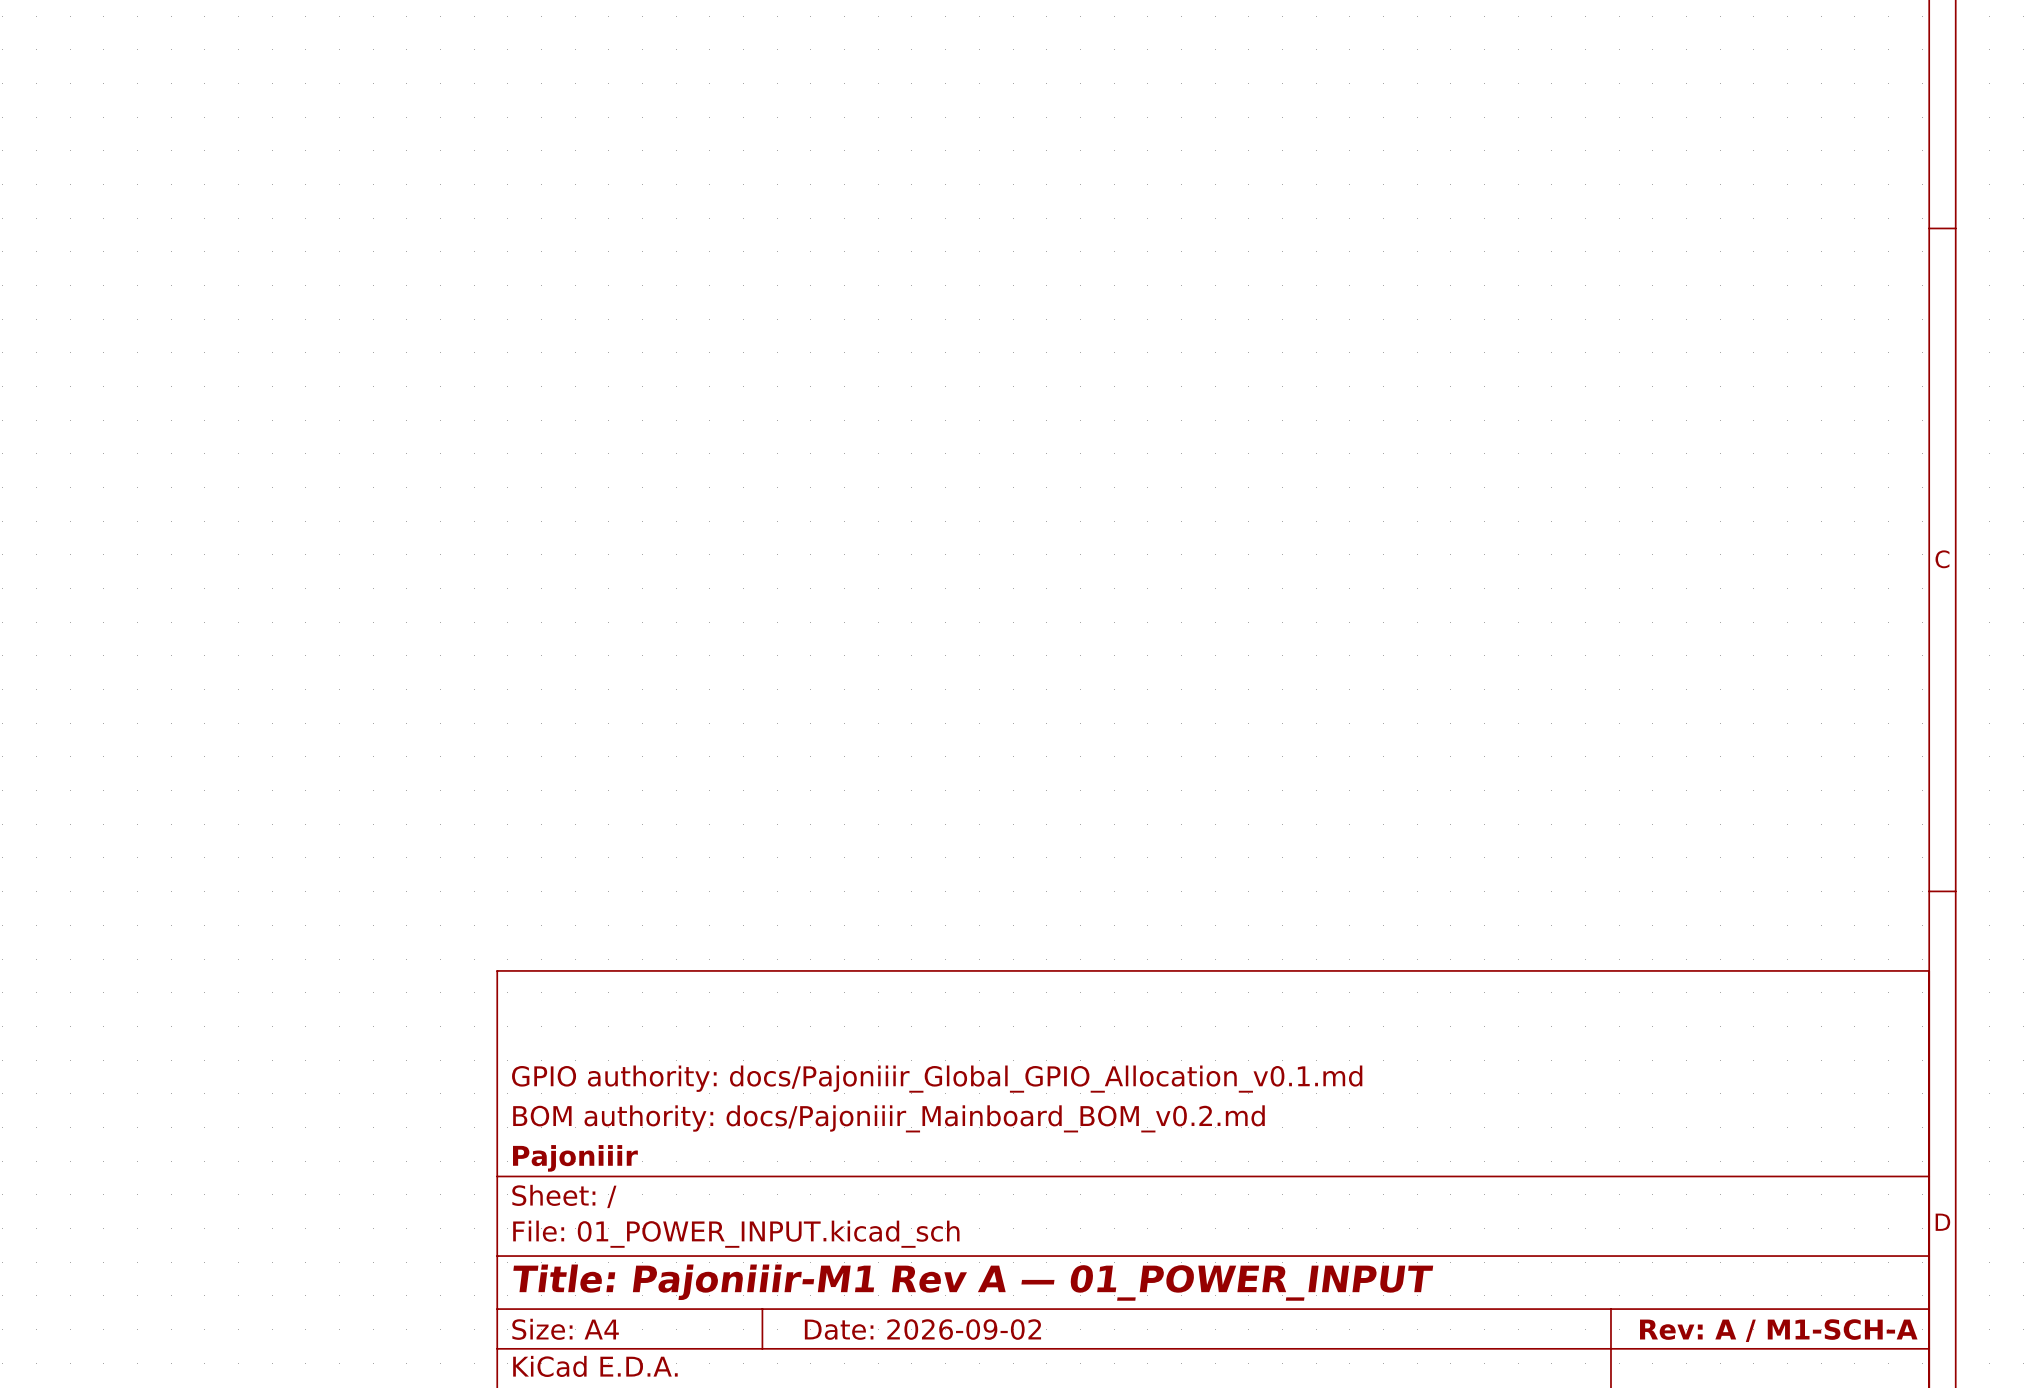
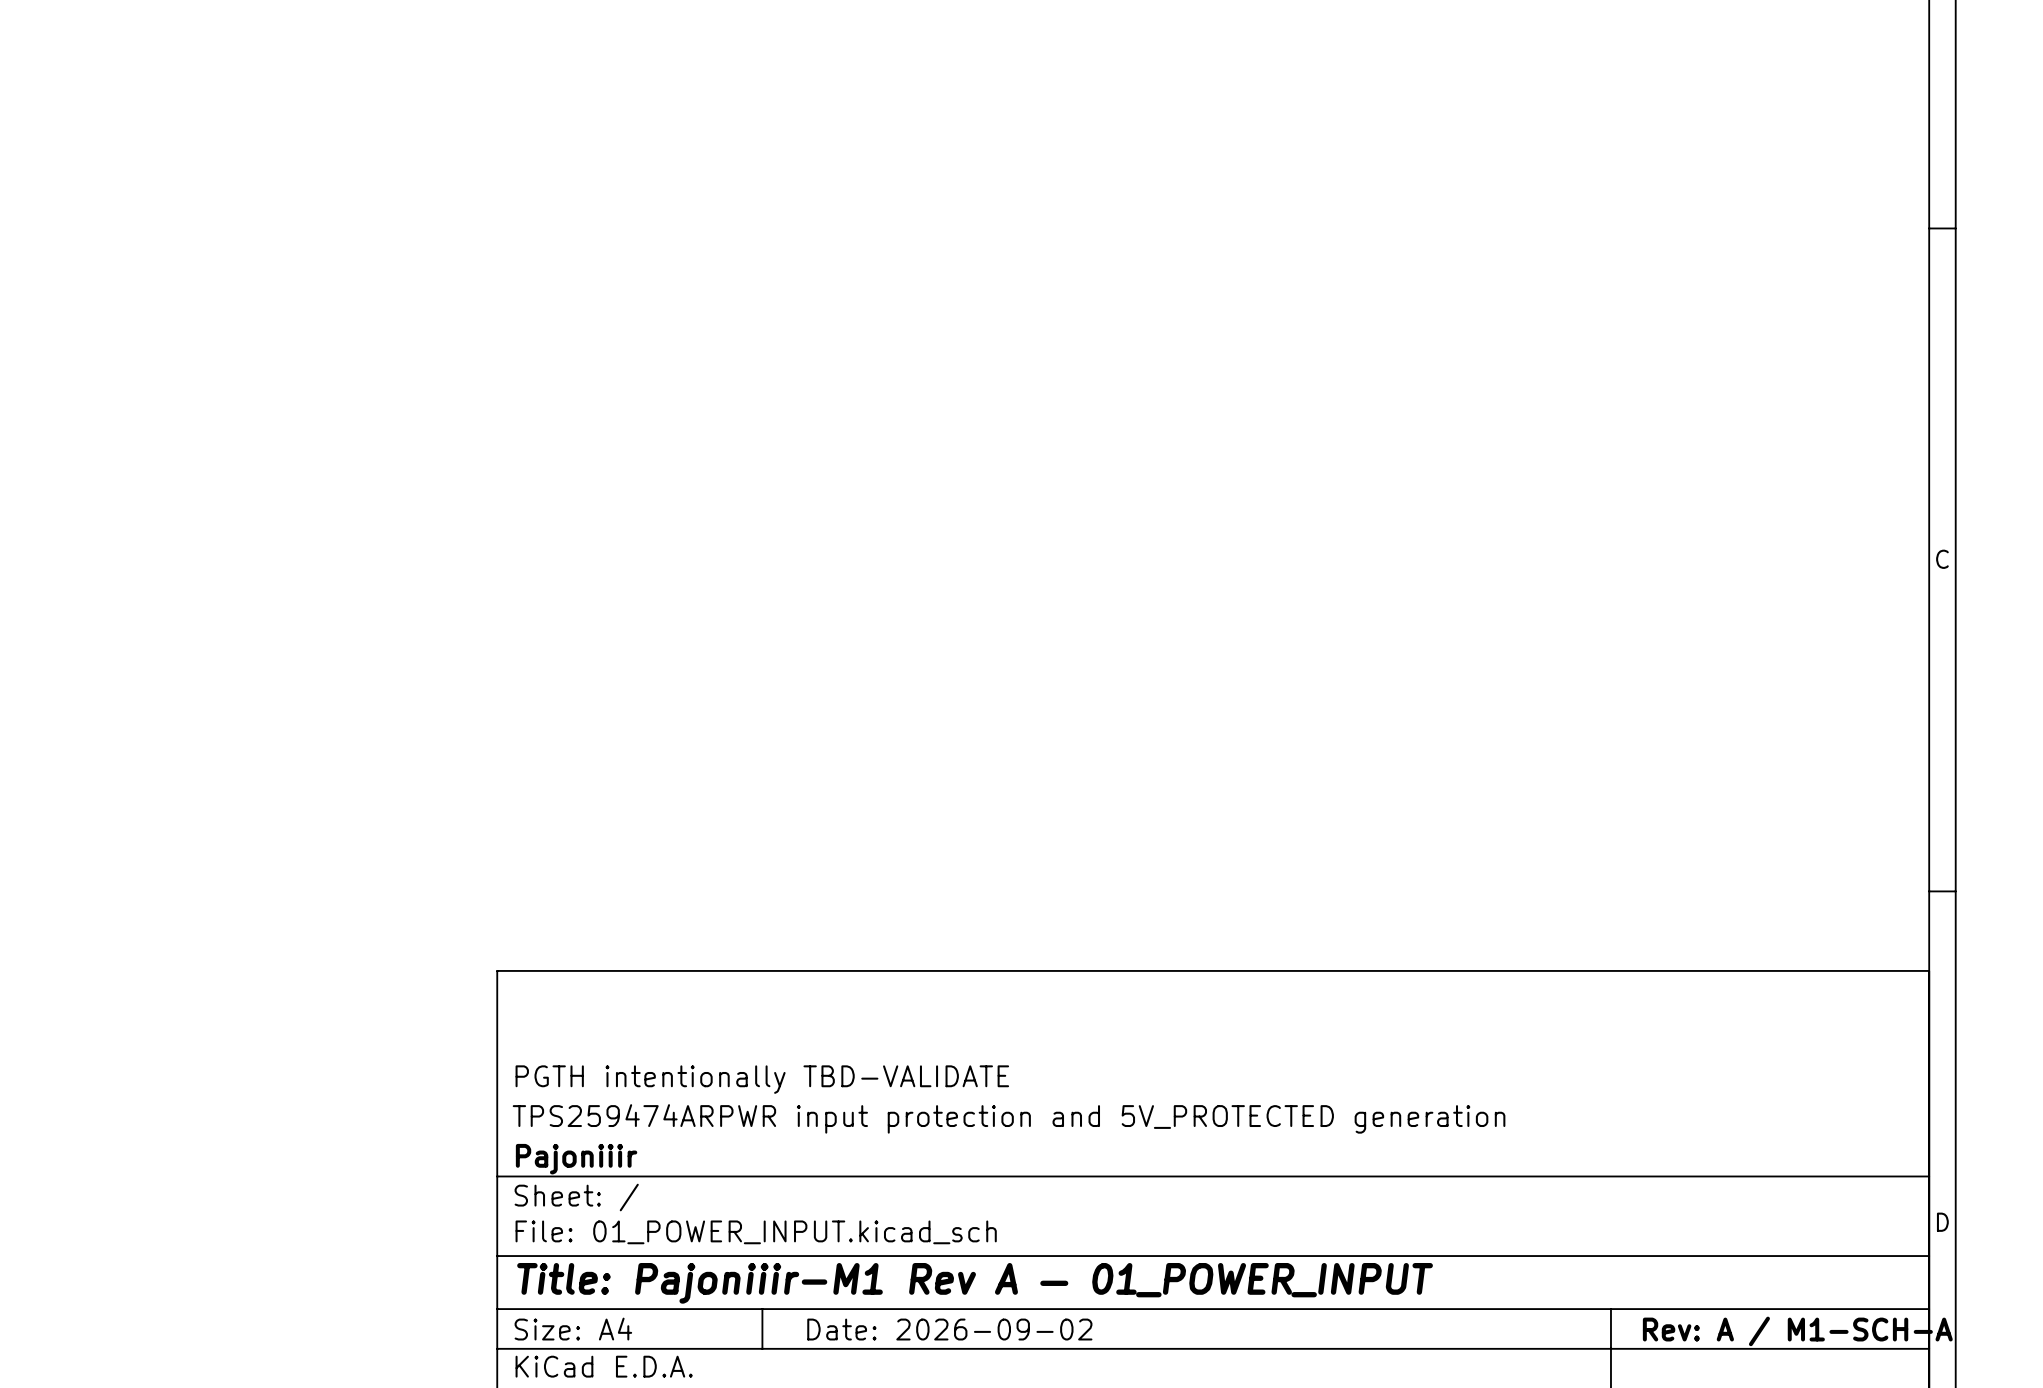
title block: GPIO authority: docs/Pajoniiir_Global_GPIO_Allocation_v0.1.md (937, 1079) -> PGTH intentionally TBD-VALIDATE (762, 1079)
title block: BOM authority: docs/Pajoniiir_Mainboard_BOM_v0.2.md (888, 1118) -> TPS259474ARPWR input protection and 5V_PROTECTED generation (1009, 1118)

